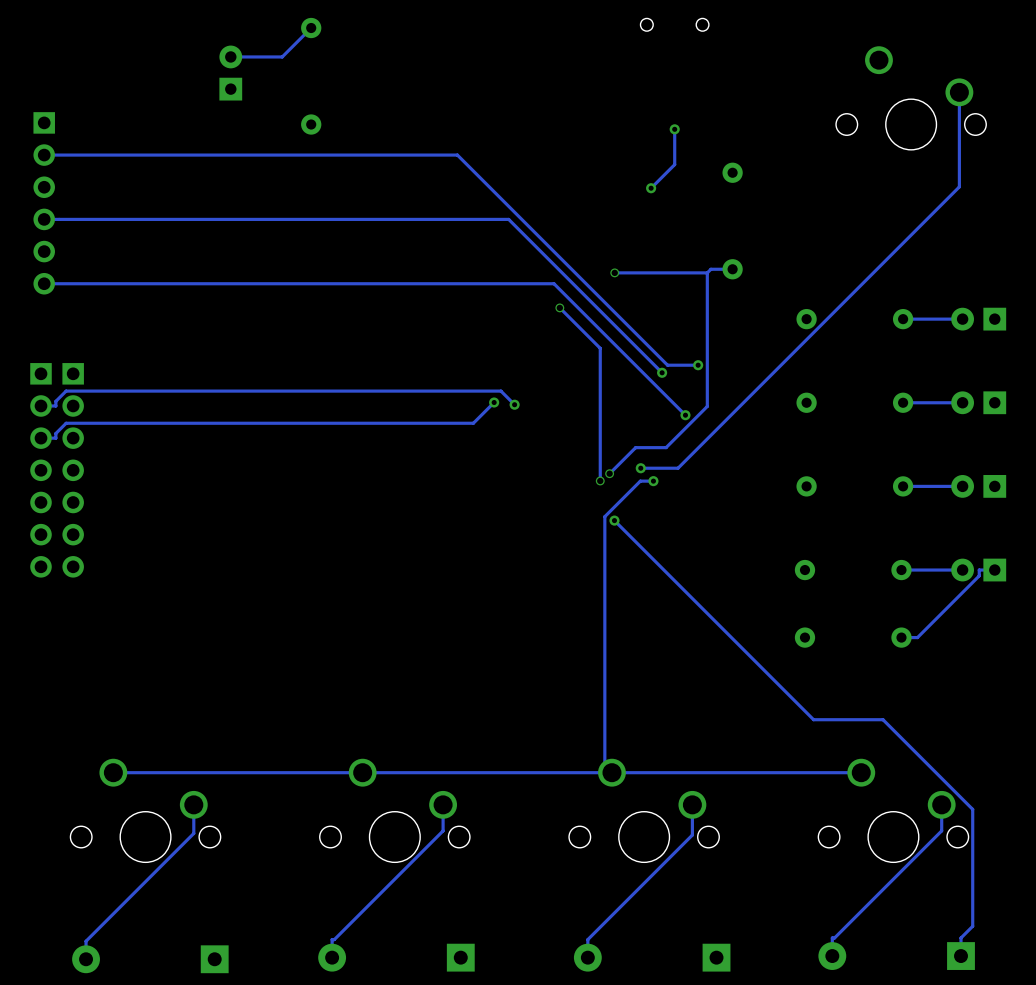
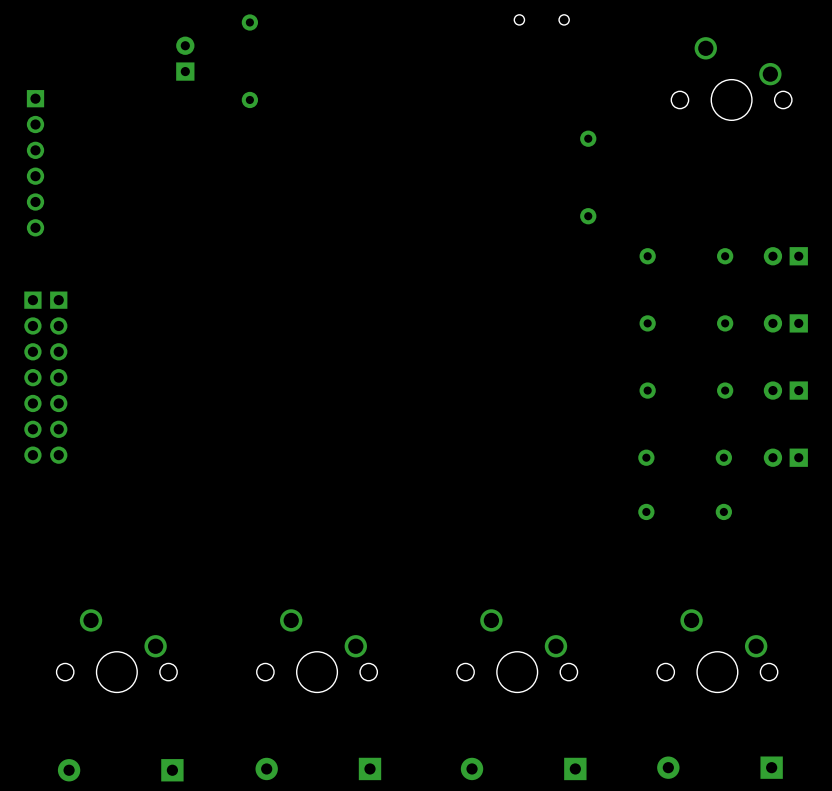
track: (311, 28) (282, 56) (230, 56) -> none
track: (959, 92) (959, 186) (678, 468) (640, 468) -> none
track: (674, 129) (674, 164) (651, 188) -> none
via: (674, 129) -> none
track: (44, 155) (457, 155) (667, 365) (698, 365) -> none
via: (651, 188) -> none
track: (44, 219) (508, 219) (662, 372) -> none
track: (732, 269) (710, 269) (707, 272) -> none
via: (614, 272) -> none
track: (707, 272) (707, 406) (666, 447) (635, 447) (609, 473) -> none
track: (707, 272) (614, 272) -> none
track: (44, 283) (554, 283) (685, 415) -> none
track: (559, 307) (600, 348) (600, 480) -> none
via: (559, 307) -> none
track: (962, 319) (903, 319) -> none
via: (698, 365) -> none
via: (662, 372) -> none
track: (494, 402) (473, 423) (66, 423) (55, 433) (55, 438) (41, 438) -> none
via: (494, 402) -> none
track: (962, 402) (903, 402) -> none
track: (514, 404) (500, 391) (66, 391) (55, 401) (55, 405) (41, 405) -> none
via: (514, 404) -> none
via: (685, 415) -> none
via: (640, 468) -> none
via: (609, 473) -> none
via: (600, 480) -> none
track: (653, 481) (640, 481) (604, 516) (604, 772) -> none
via: (653, 481) -> none
track: (962, 486) (903, 486) -> none
track: (614, 520) (813, 719) (883, 719) (972, 809) (972, 926) (961, 937) (961, 956) -> none
via: (614, 520) -> none
track: (962, 570) (901, 570) -> none
track: (994, 570) (979, 570) (979, 575) (917, 637) (901, 637) -> none
track: (861, 772) (113, 772) -> none
track: (193, 804) (193, 833) (86, 941) (86, 959) -> none
track: (443, 804) (443, 830) (334, 939) (332, 939) (332, 957) -> none
track: (692, 804) (692, 835) (587, 939) (587, 957) -> none
track: (941, 804) (941, 830) (834, 937) (832, 937) (832, 956) -> none

